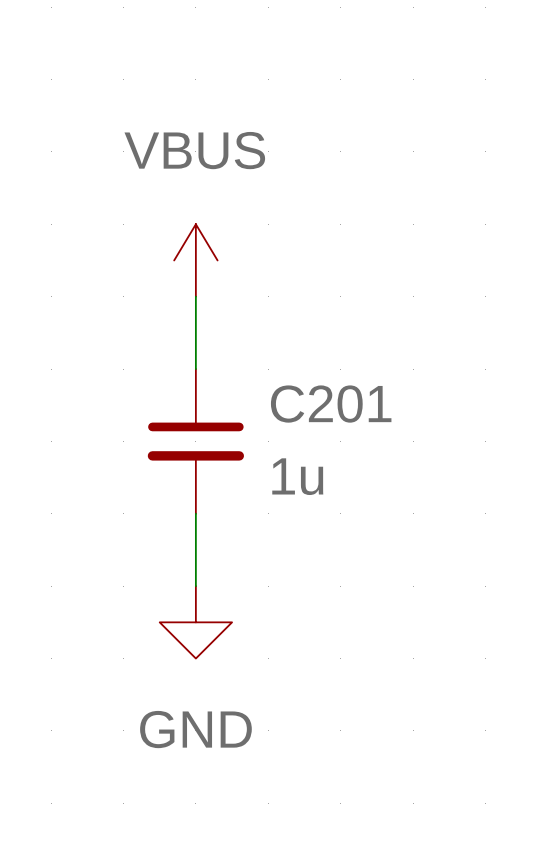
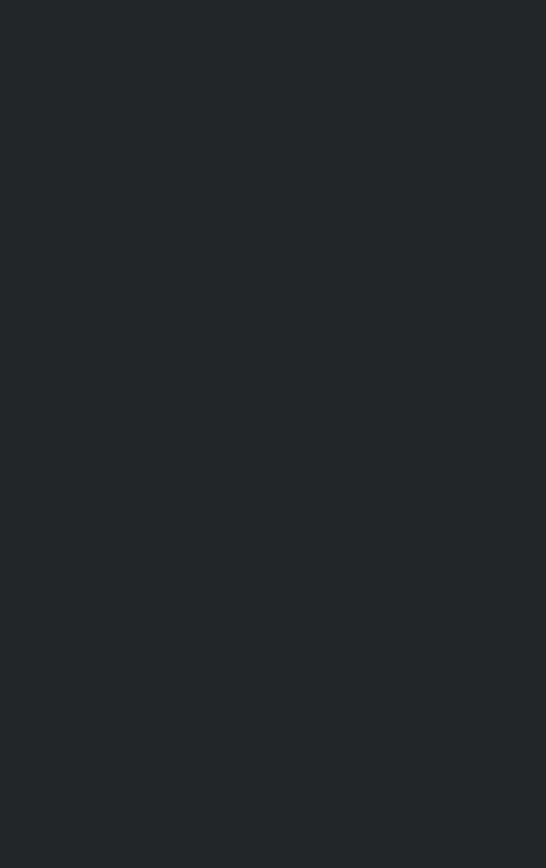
power symbol: VBUS (195, 260) -> none
wire: (195, 296) (195, 369) -> none
C201: 1u (195, 441) -> none
wire: (195, 513) (195, 586) -> none
power symbol: GND (195, 622) -> none

